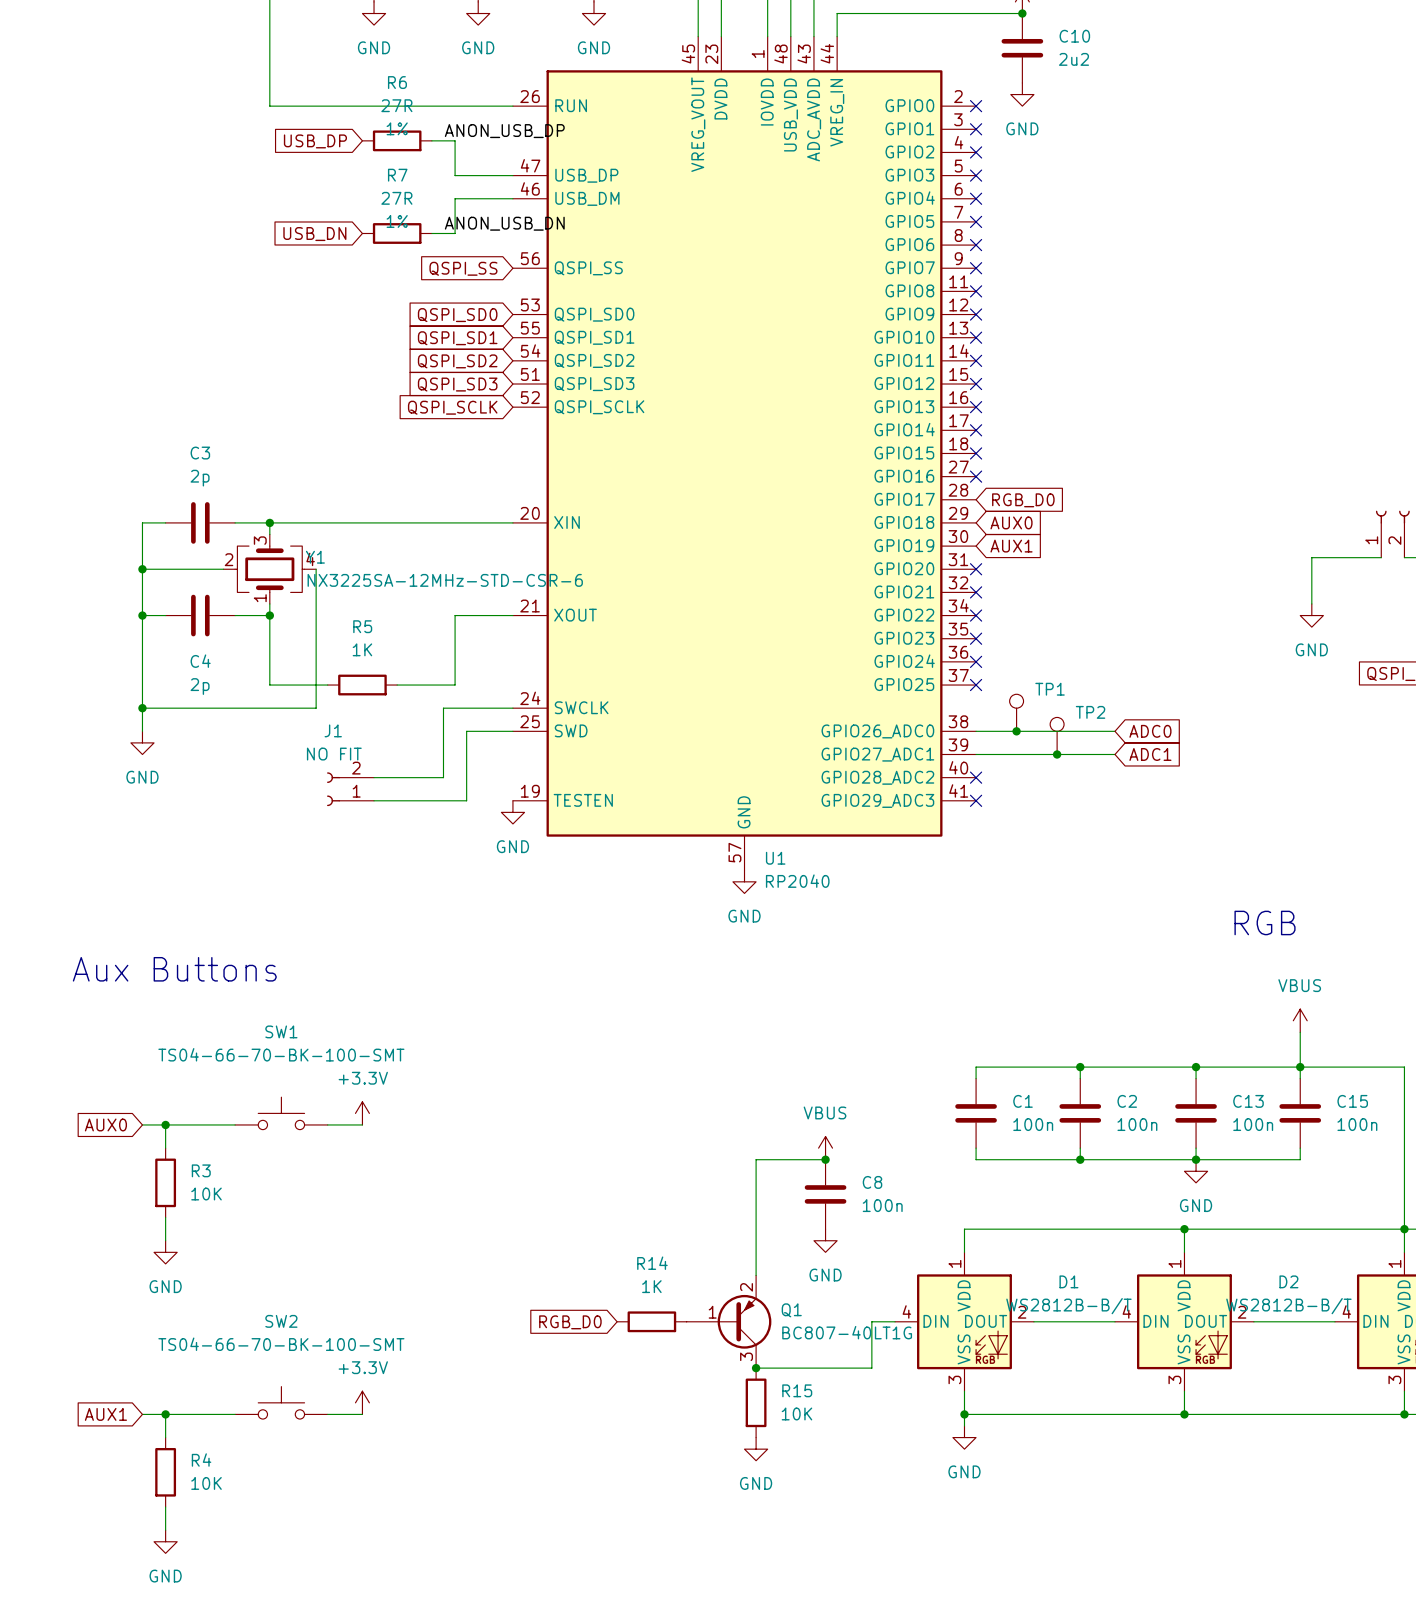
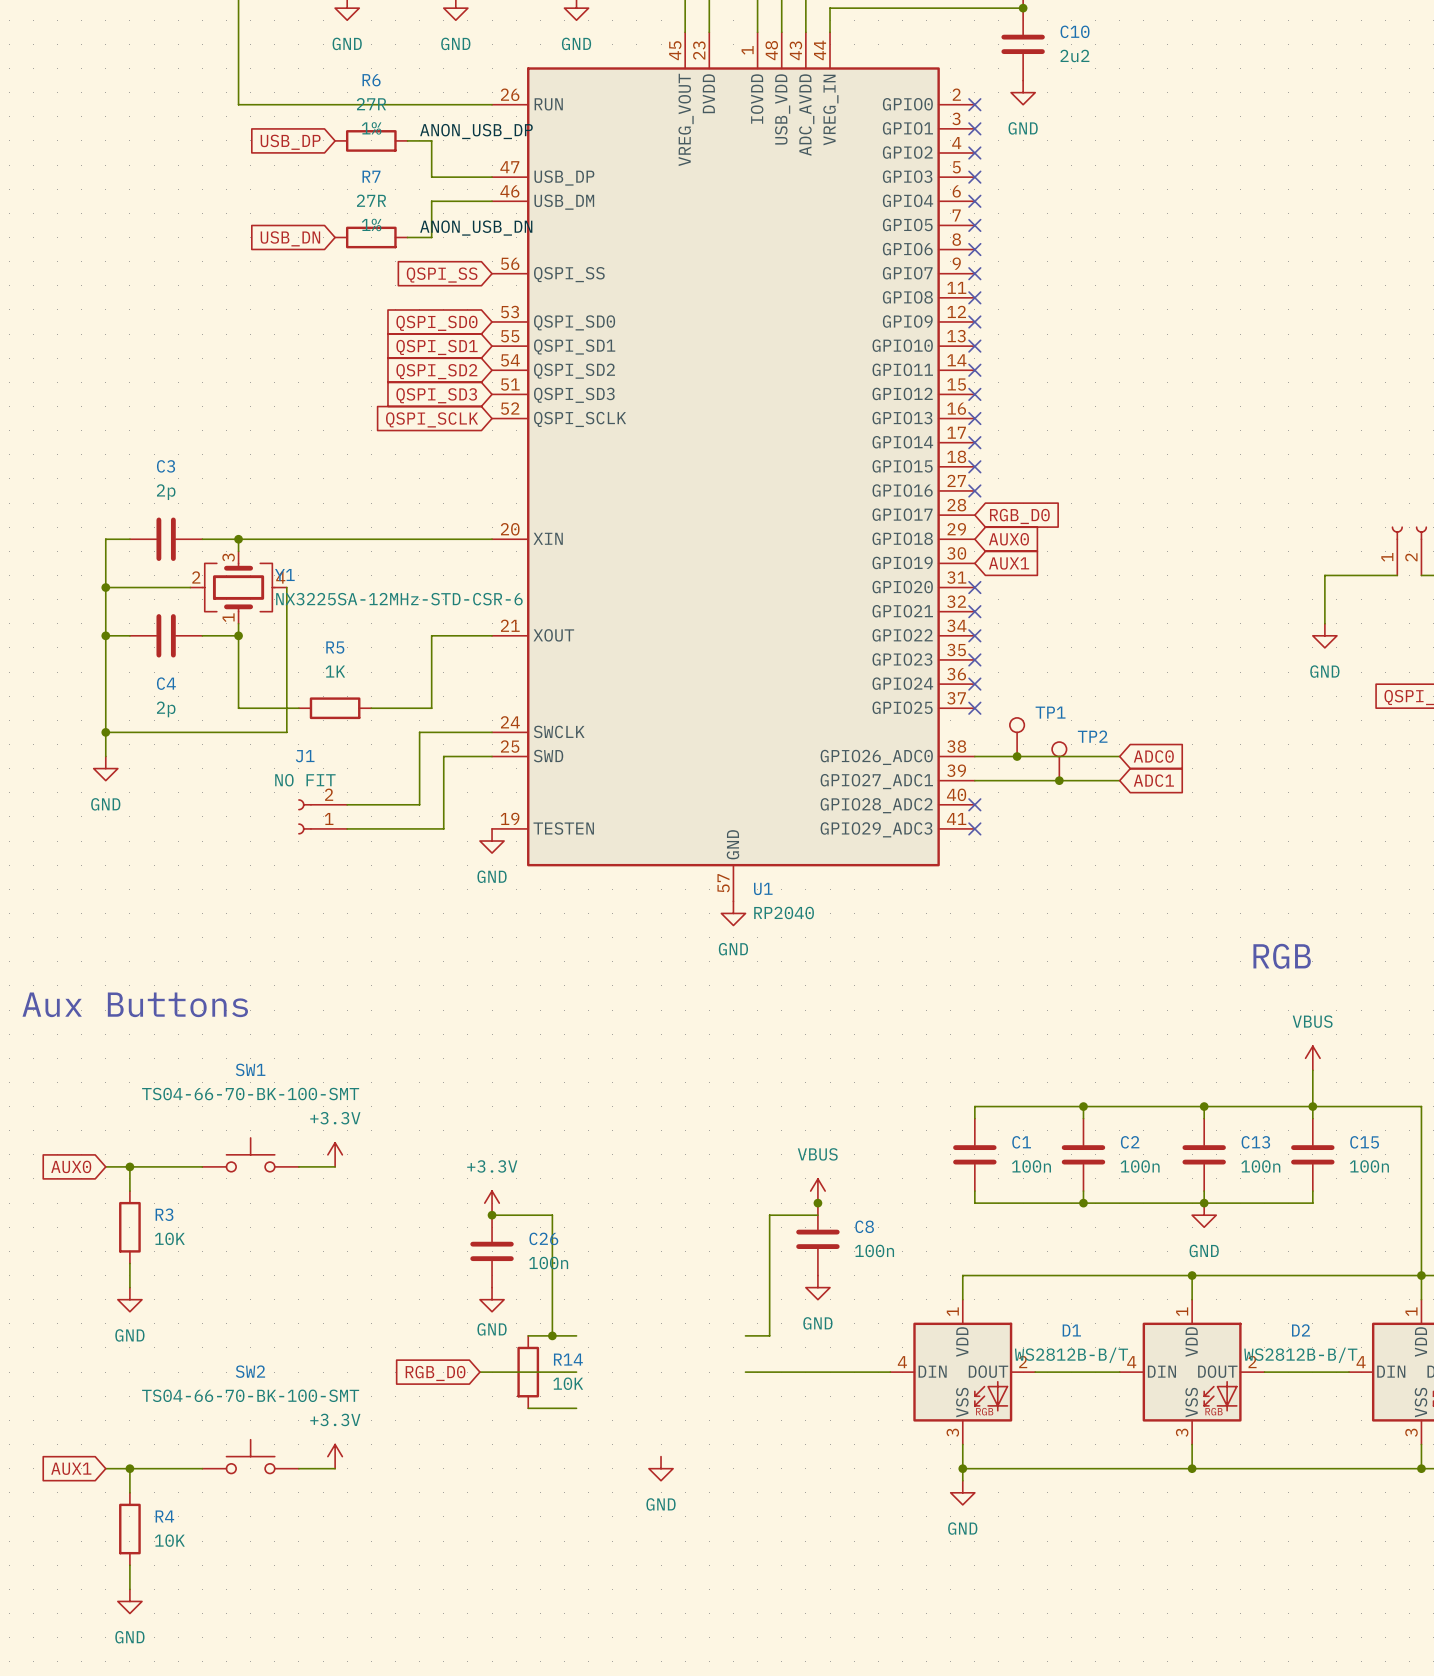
power symbol: none -> +3.3V (492, 1203)
wire: (825, 1159) (756, 1159) (756, 1275) -> none
wire: none -> (492, 1215) (552, 1215) (552, 1335)
junction: none -> (492, 1215)
wire: none -> (817, 1215) (769, 1215) (769, 1335) (745, 1335)
C26: none -> 100n (492, 1251)
power symbol: none -> GND (492, 1299)
R14 name position: R14 (652, 1263) -> R14 (568, 1359)
R14 value: 1K (651, 1286) -> 10K (568, 1383)
wire: none -> (528, 1335) (576, 1335)
junction: none -> (552, 1335)
wire: none -> (479, 1372) (576, 1372)
R14 rotation: 0° (651, 1321) -> 90° clockwise (528, 1372)
R14 position: (651, 1321) -> (528, 1372)
Q1: BC807-40LT1G (728, 1321) -> none
wire: (871, 1321) (871, 1368) (756, 1368) -> (866, 1372) (745, 1372)
global label position: RGB_D0 (570, 1322) -> RGB_D0 (435, 1373)
wire: none -> (528, 1408) (576, 1408)
junction: (756, 1368) -> none
R15: 10K (756, 1402) -> none
power symbol position: GND (756, 1449) -> GND (661, 1468)

